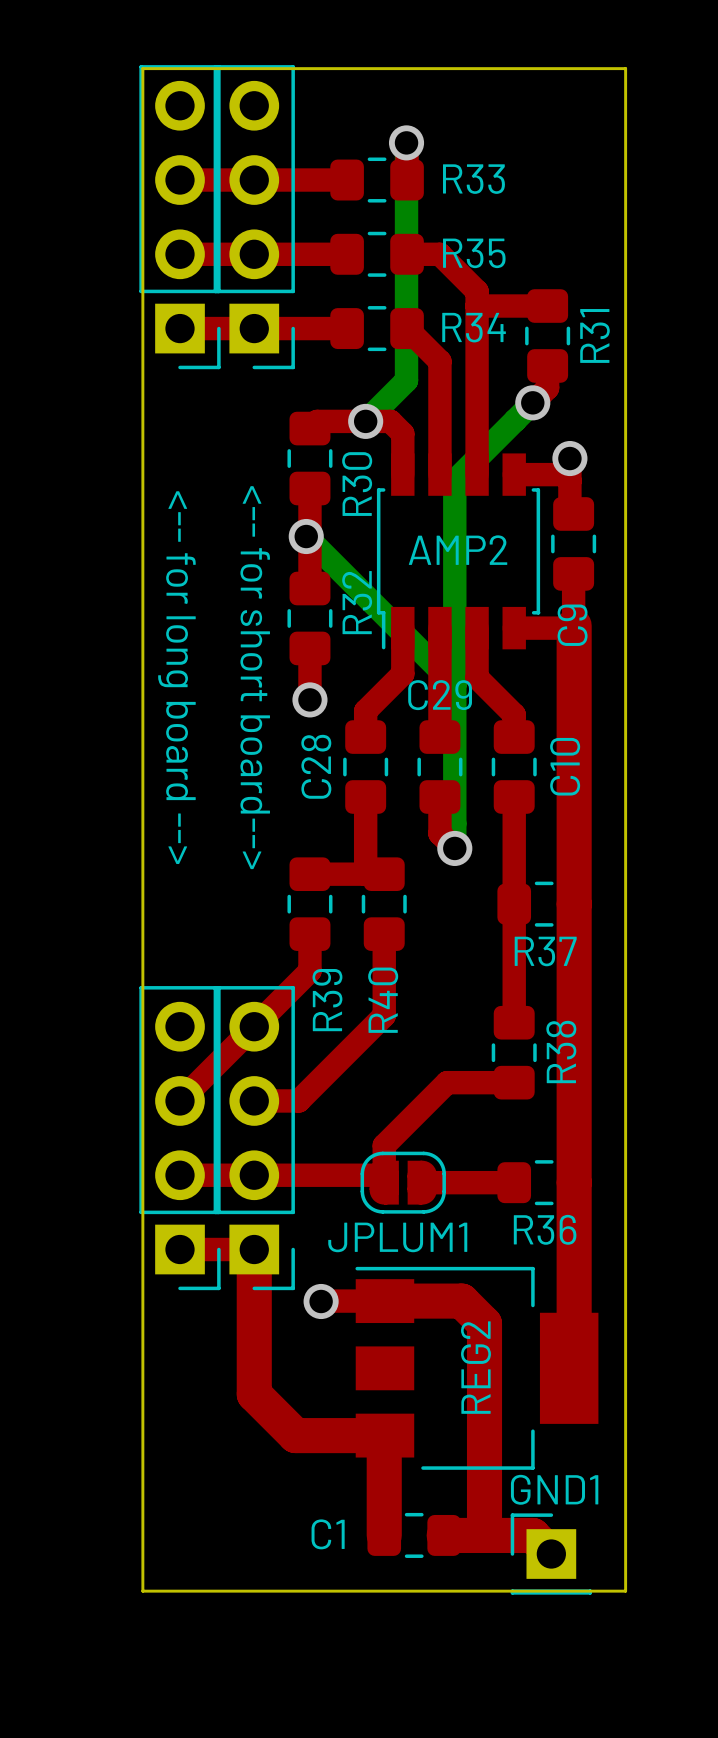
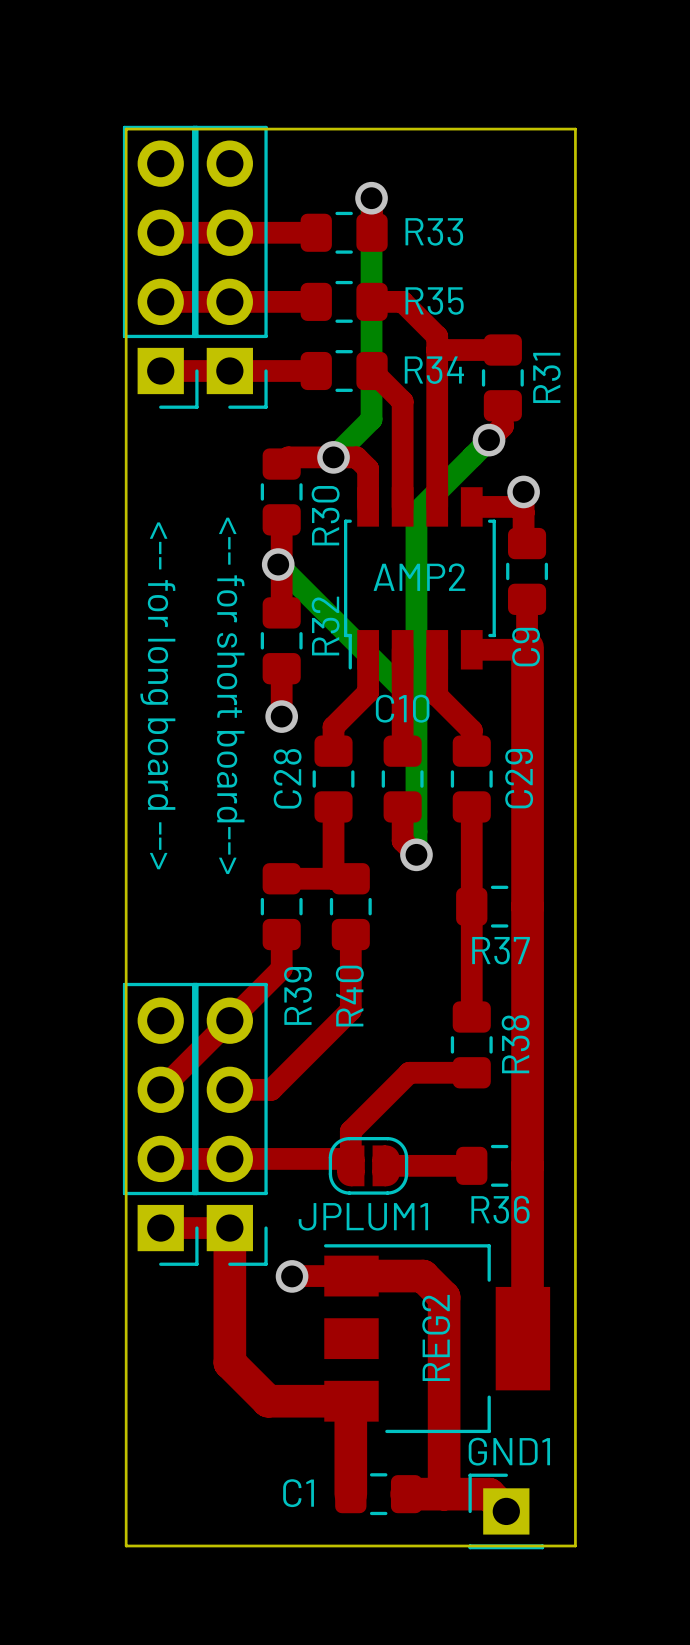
C29 name rotation: 0° (440, 695) -> 90° counterclockwise (519, 778)
C29 name position: C29 (440, 695) -> C29 (519, 778)
C10 name rotation: 0° (565, 766) -> 90° clockwise (402, 708)
C10 name position: C10 (565, 766) -> C10 (402, 708)

